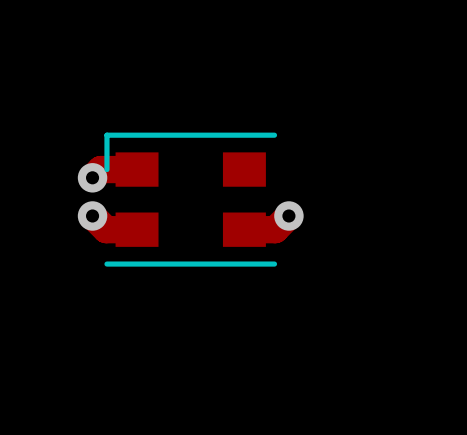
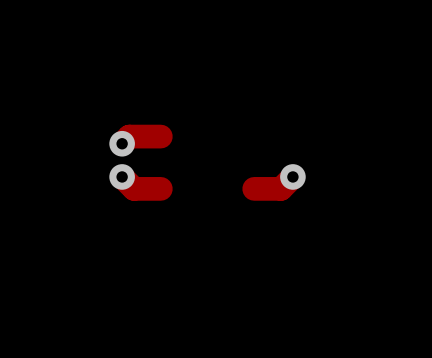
part: (190, 199) -> none

